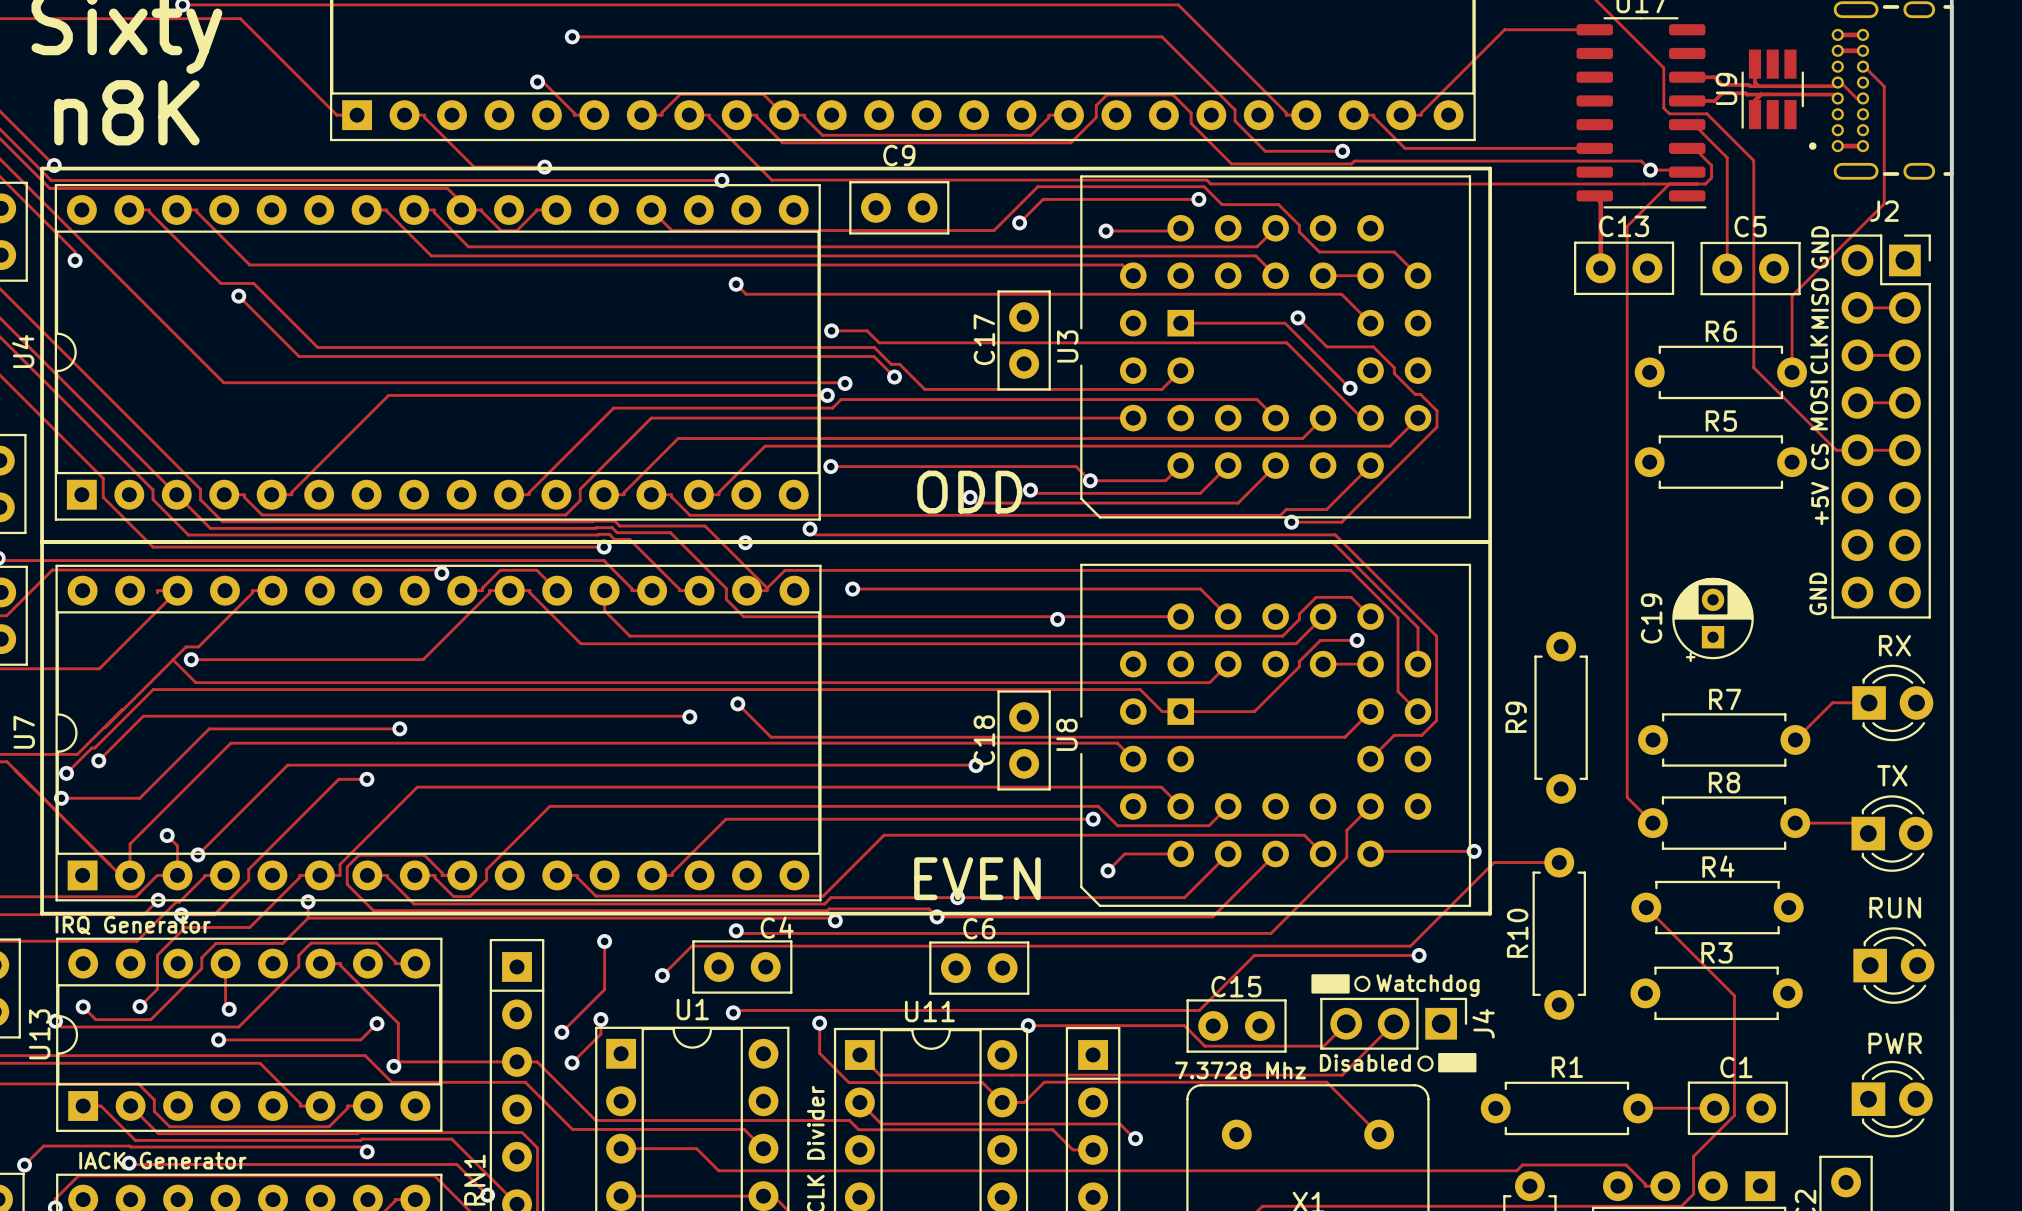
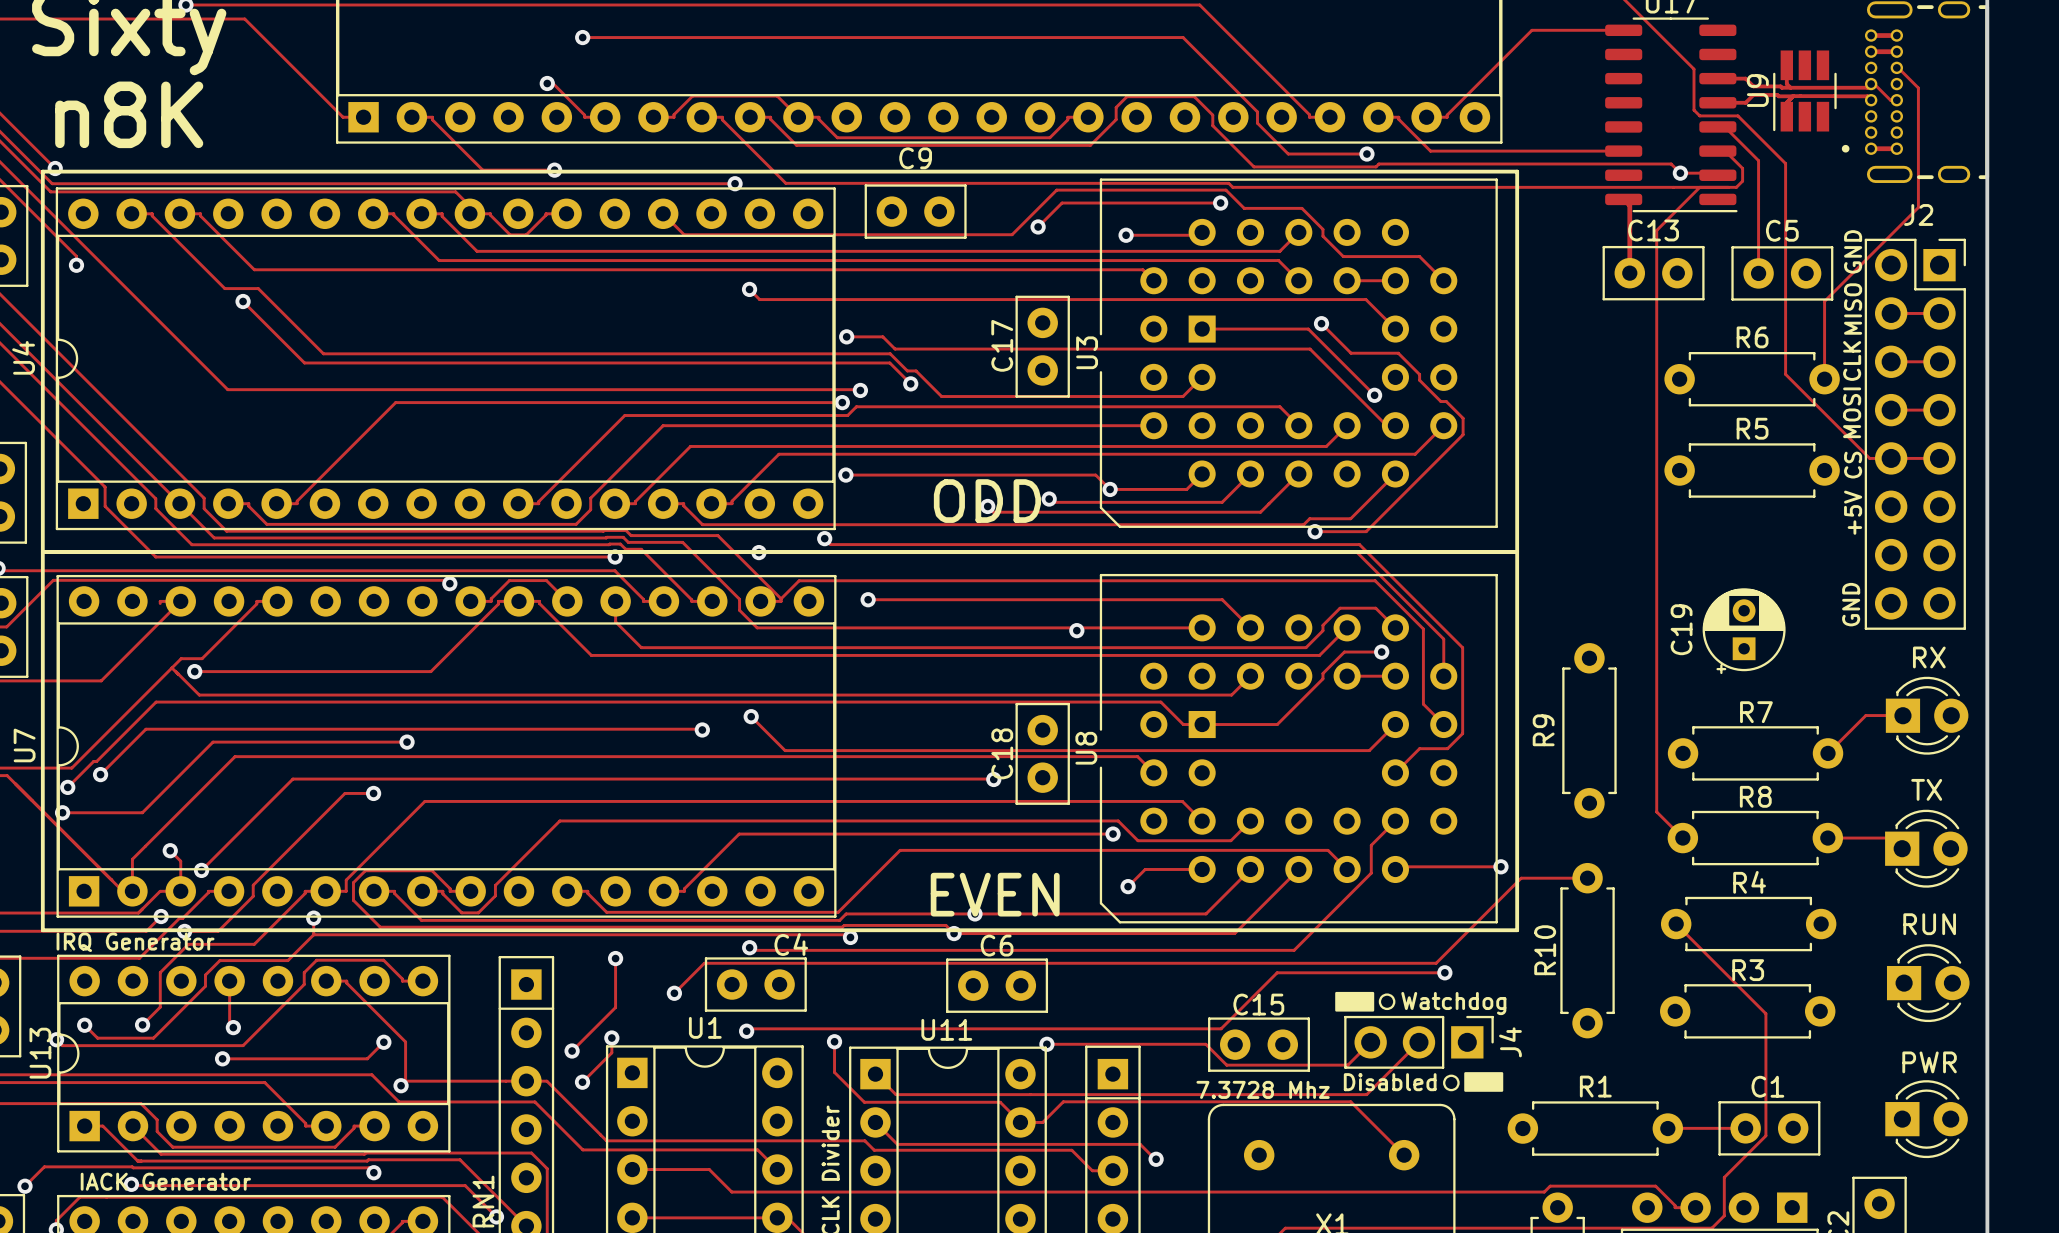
track: (186, 646) (105, 727) -> (189, 658) (181, 658) (71, 768)
track: none -> (171, 667) (177, 673)
track: (123, 709) (77, 754) (70, 754) -> none

